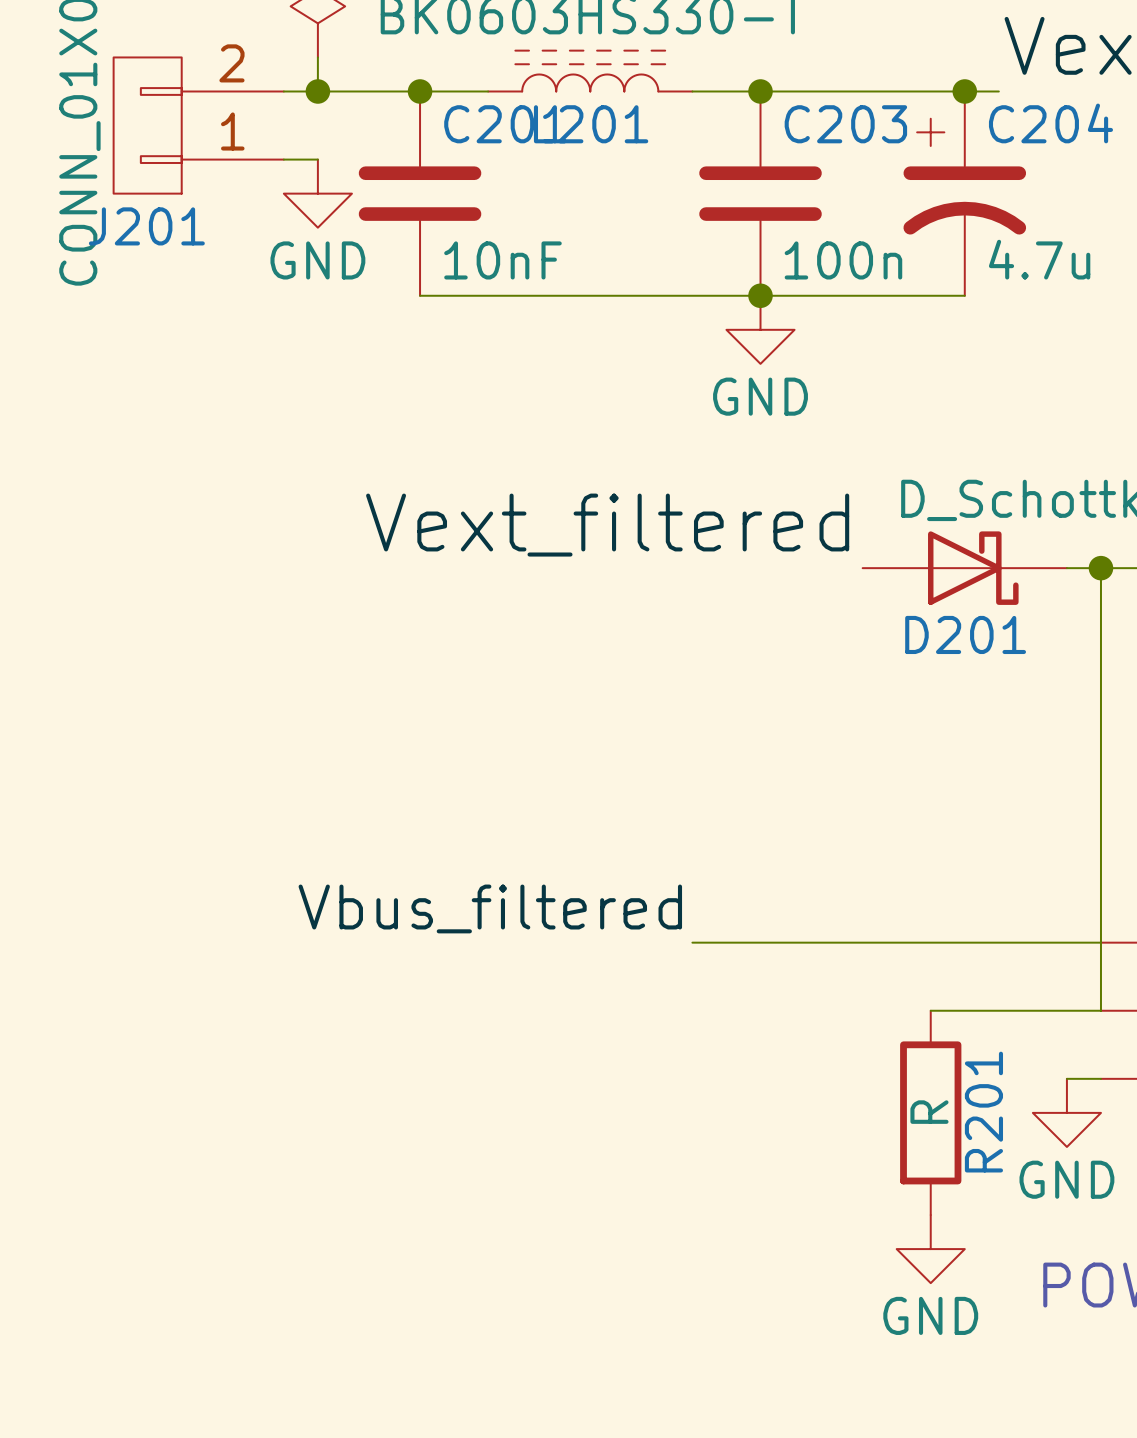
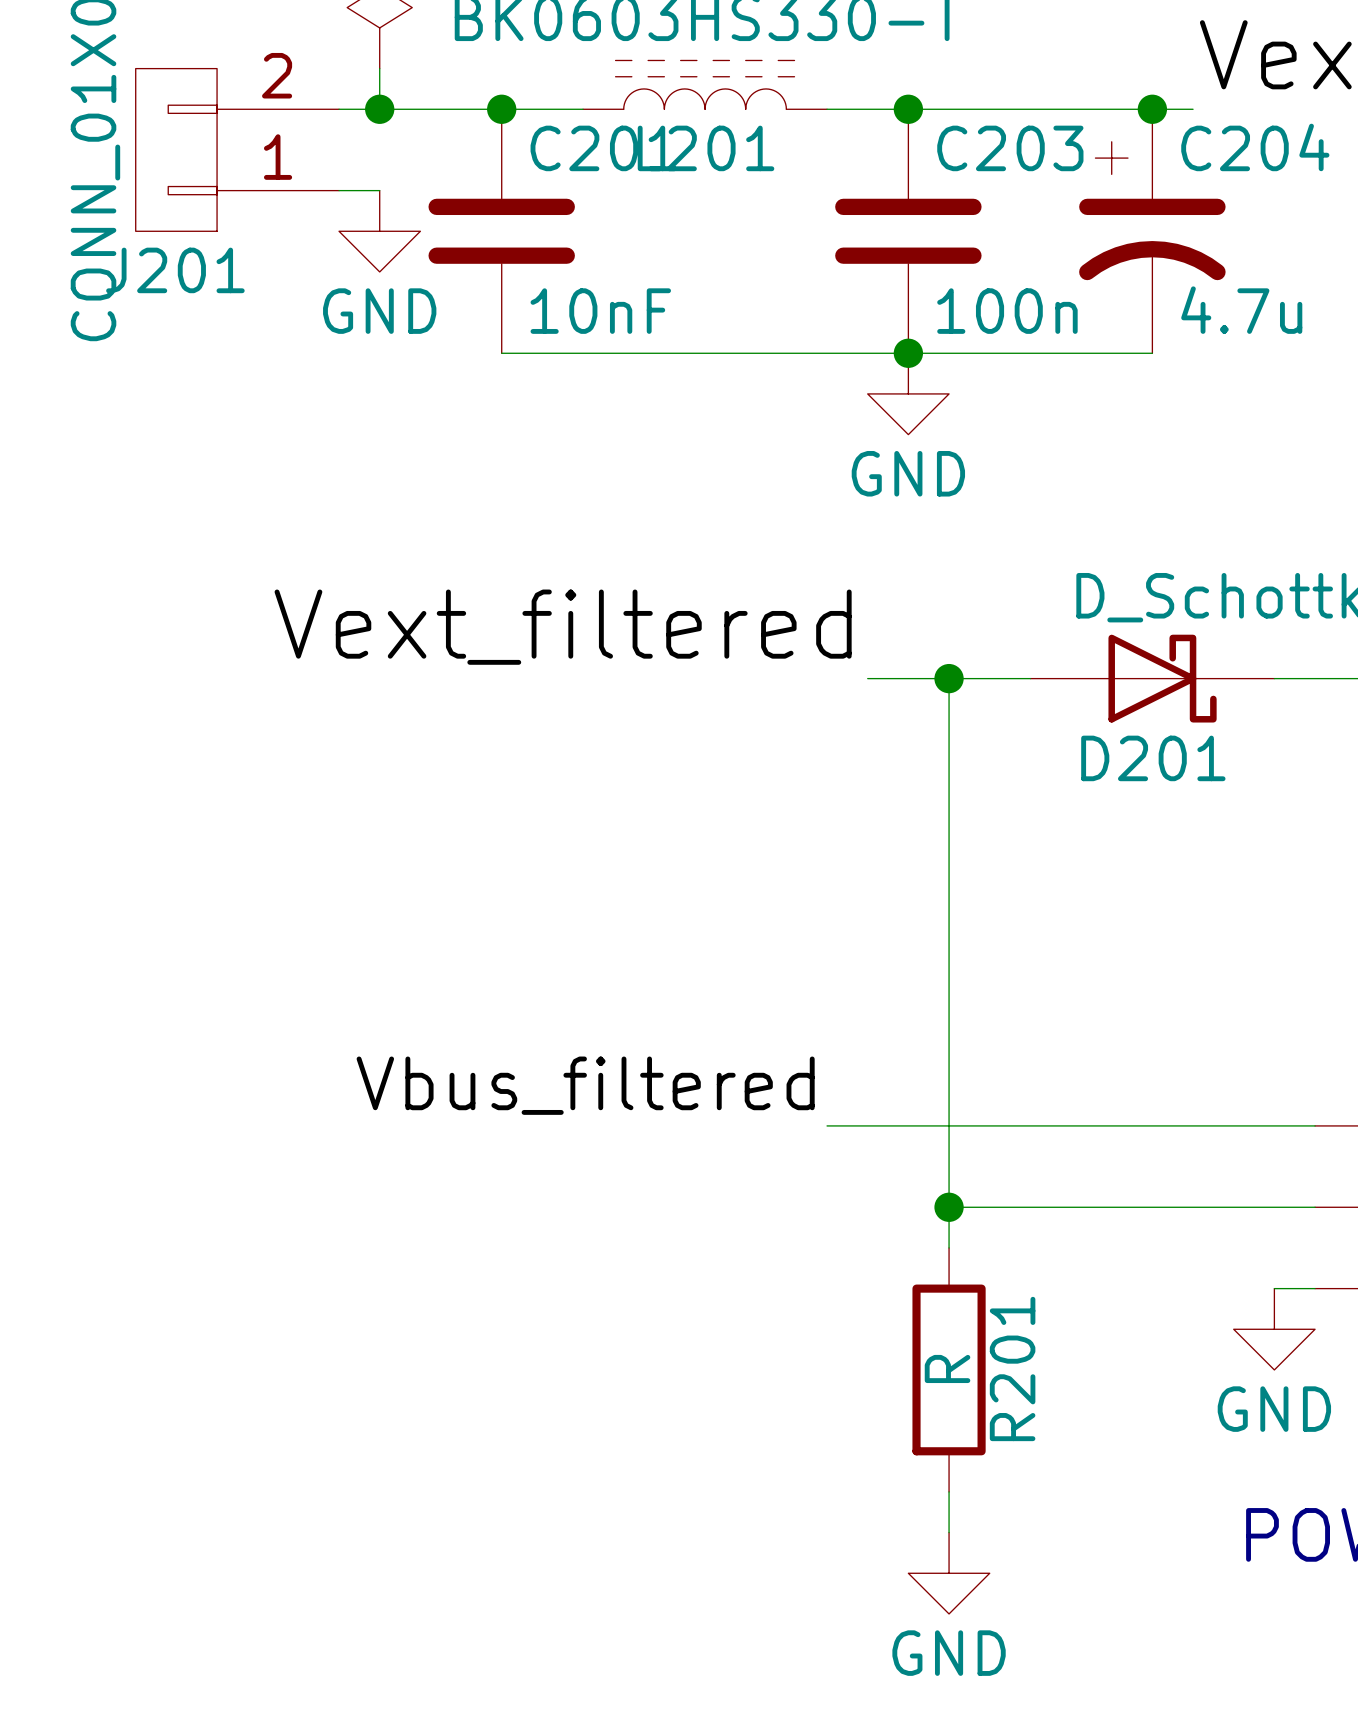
label position: Vext_filtered (607, 525) -> Vext_filtered (563, 627)
wire: none -> (867, 678) (1030, 678)
wire: none -> (949, 678) (949, 1247)
junction: none -> (949, 678)
wire: (1100, 568) (1100, 1010) -> none
junction: (1100, 568) -> none
wire: none -> (949, 1207) (1111, 1207)
junction: none -> (949, 1207)
R201 position: (930, 1112) -> (949, 1369)
wire: none -> (949, 1491) (949, 1532)
power symbol position: GND (930, 1249) -> GND (949, 1573)

